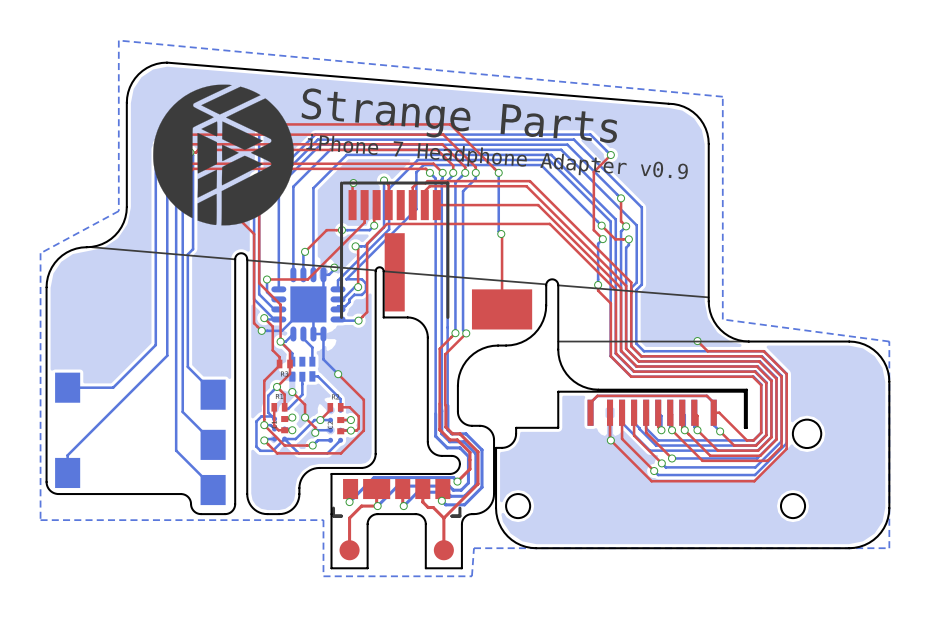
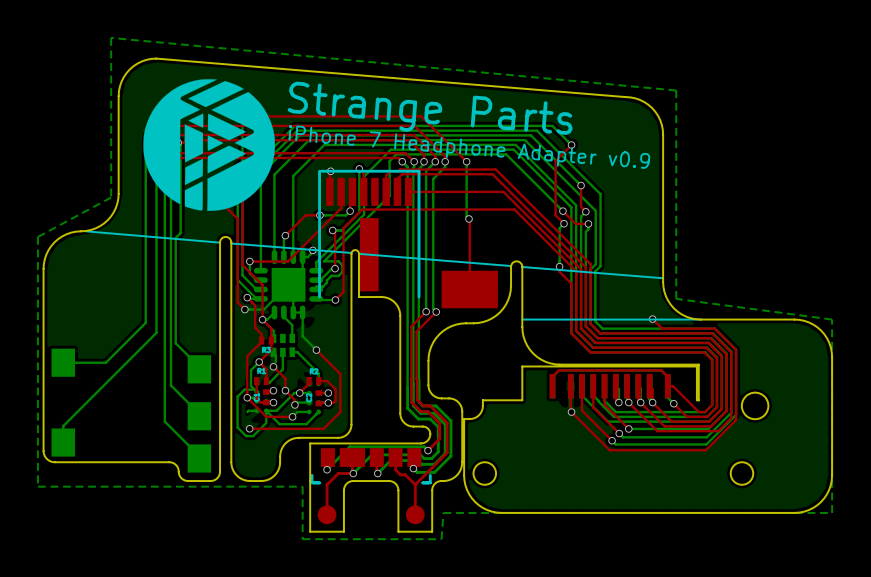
bottom track: none -> (273, 352) (275, 354) (275, 362)
bottom track: (256, 421) (256, 446) (260, 450) (272, 450) (284, 439) -> (239, 394) (237, 396) (237, 427) (246, 436) (253, 436) (266, 422) (266, 410)
top track: (363, 430) (341, 453) (277, 453) (264, 440) -> (340, 402) (340, 411) (323, 428) (249, 428)
via position: (264, 440) -> (249, 428)

